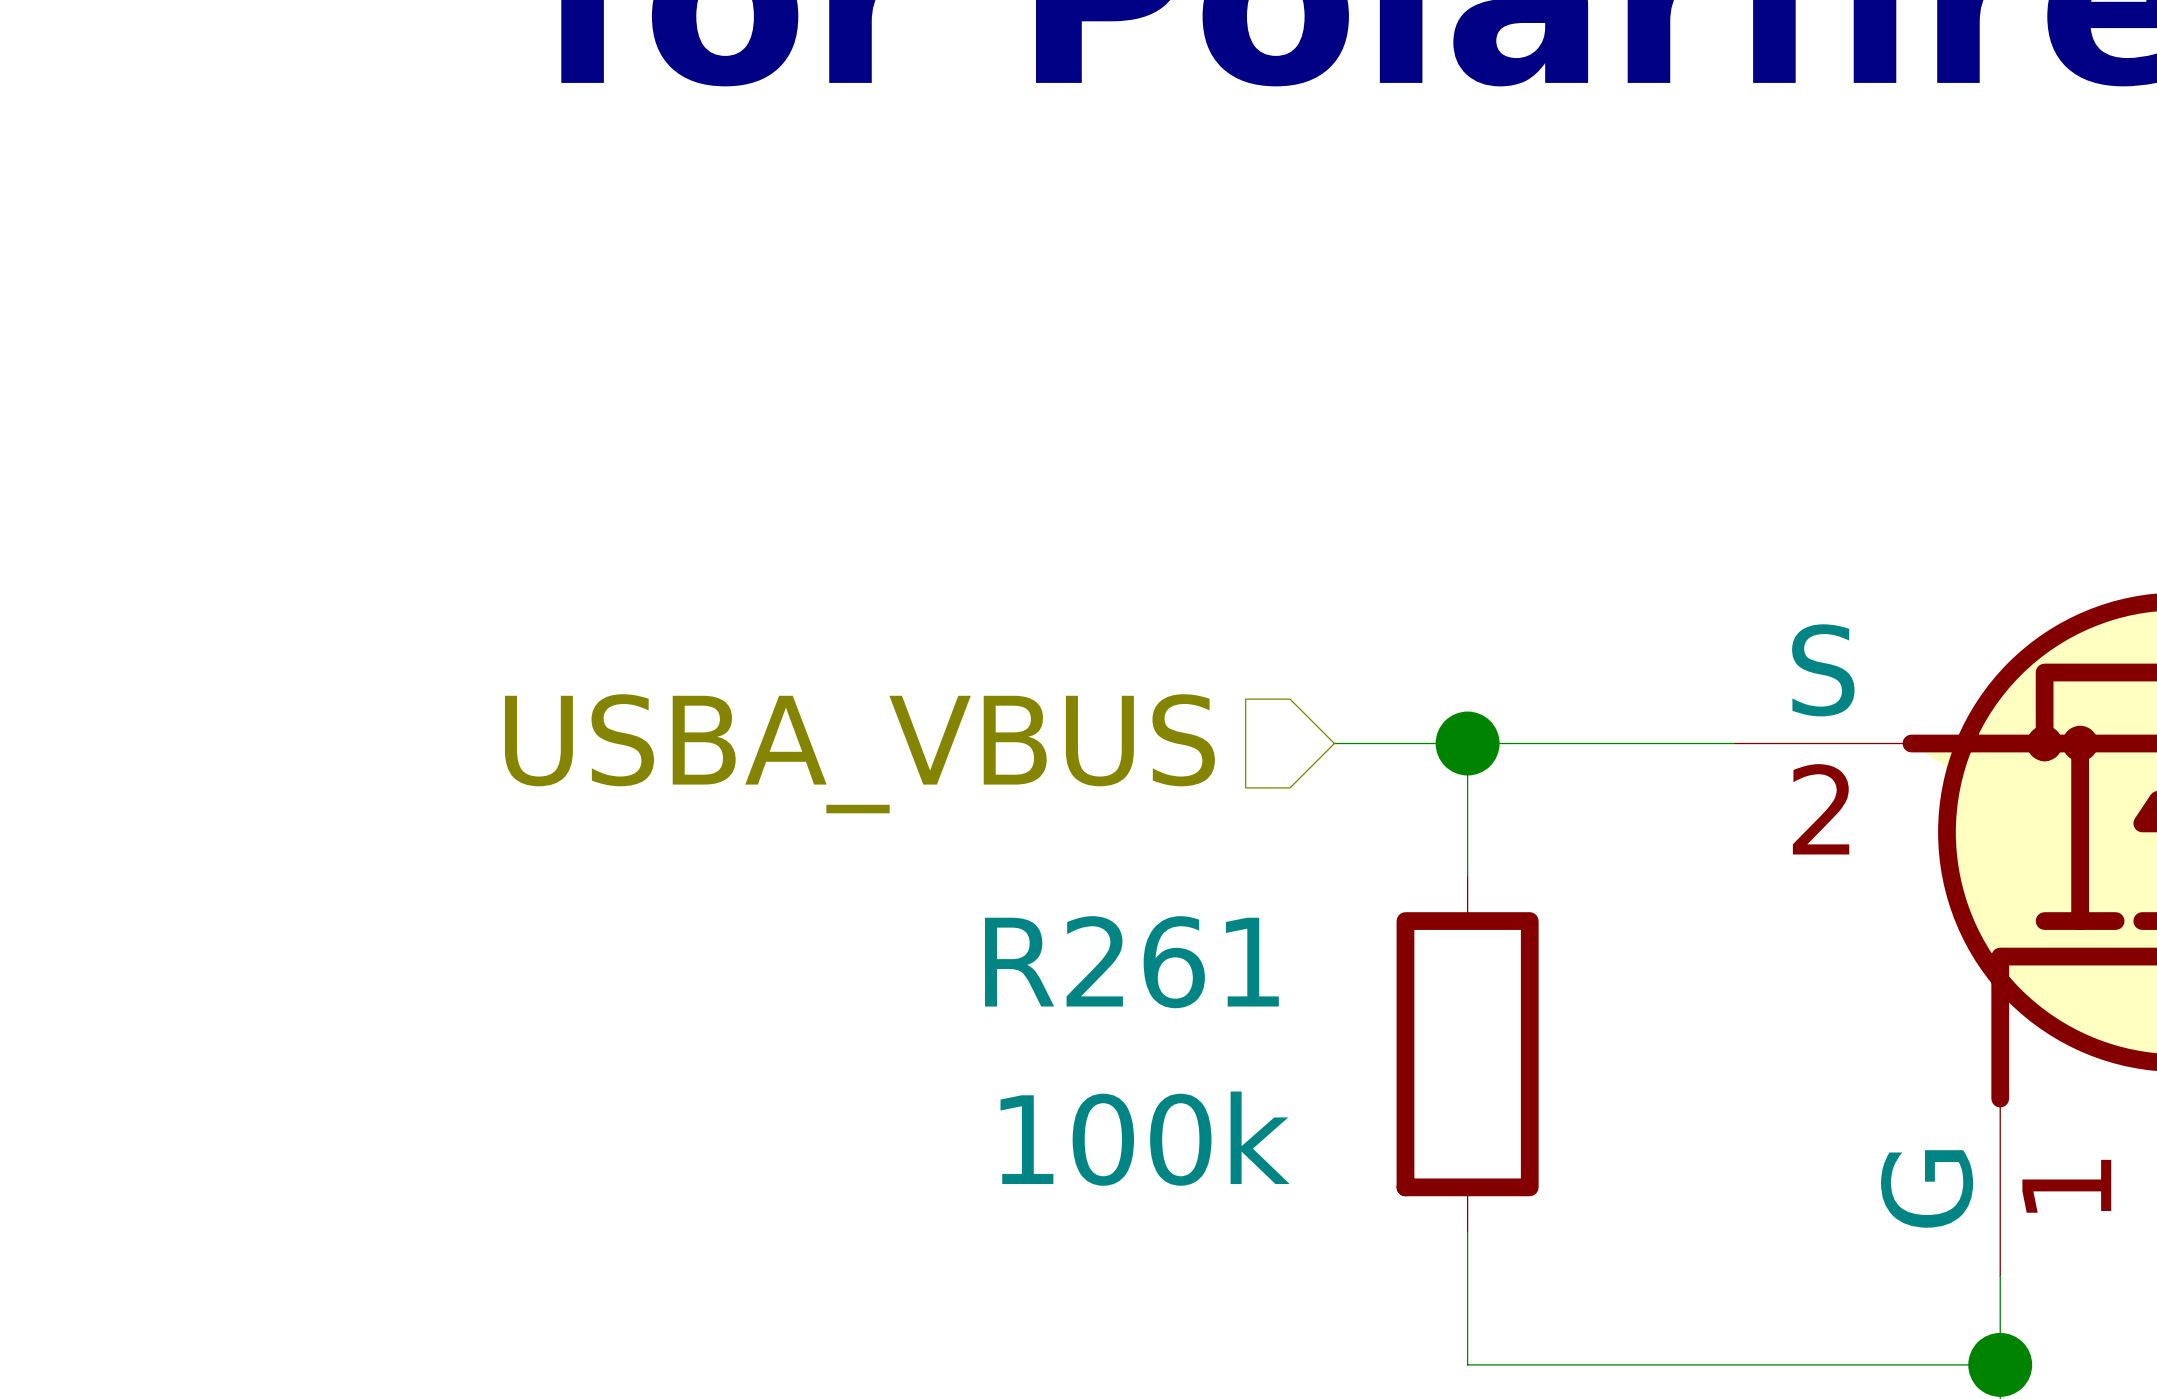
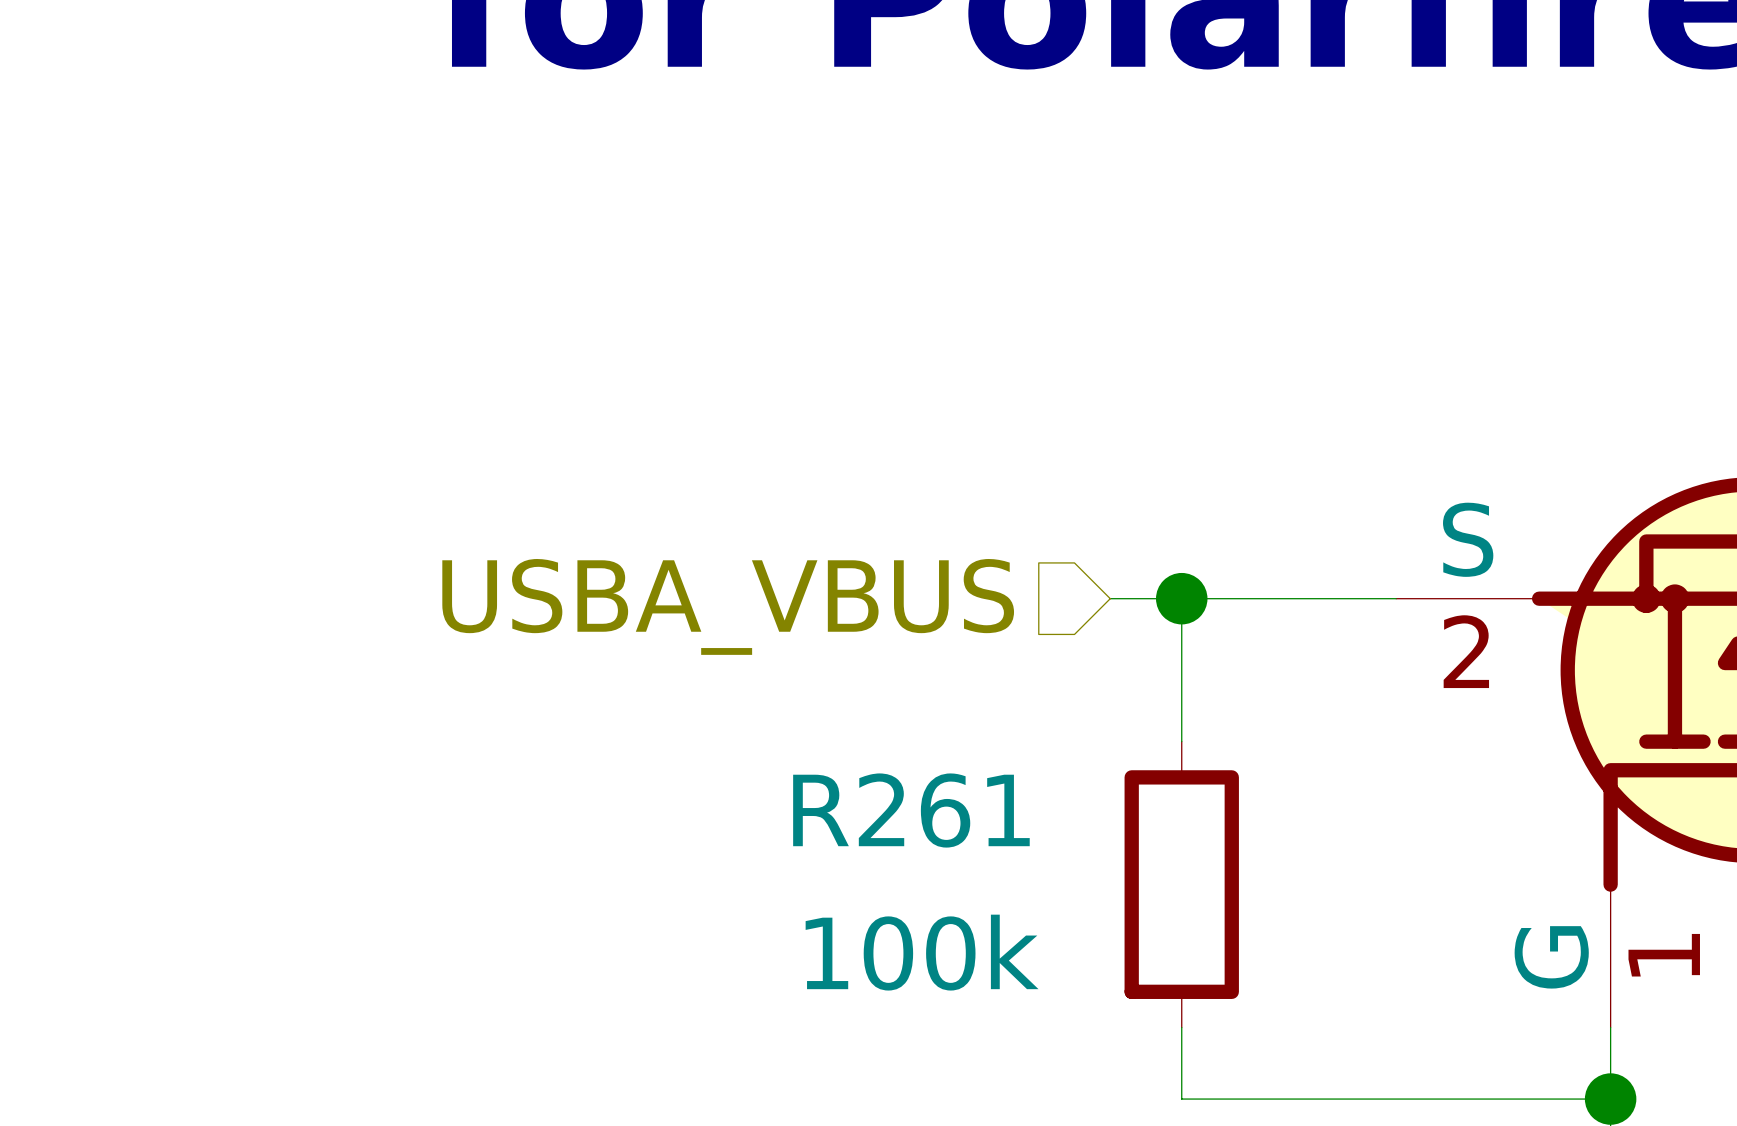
wire: (1334, 743) (1378, 743) -> none
hierarchical label position: USBA_VBUS (859, 753) -> USBA_VBUS (728, 606)
R261 position: (1467, 1054) -> (1181, 884)

